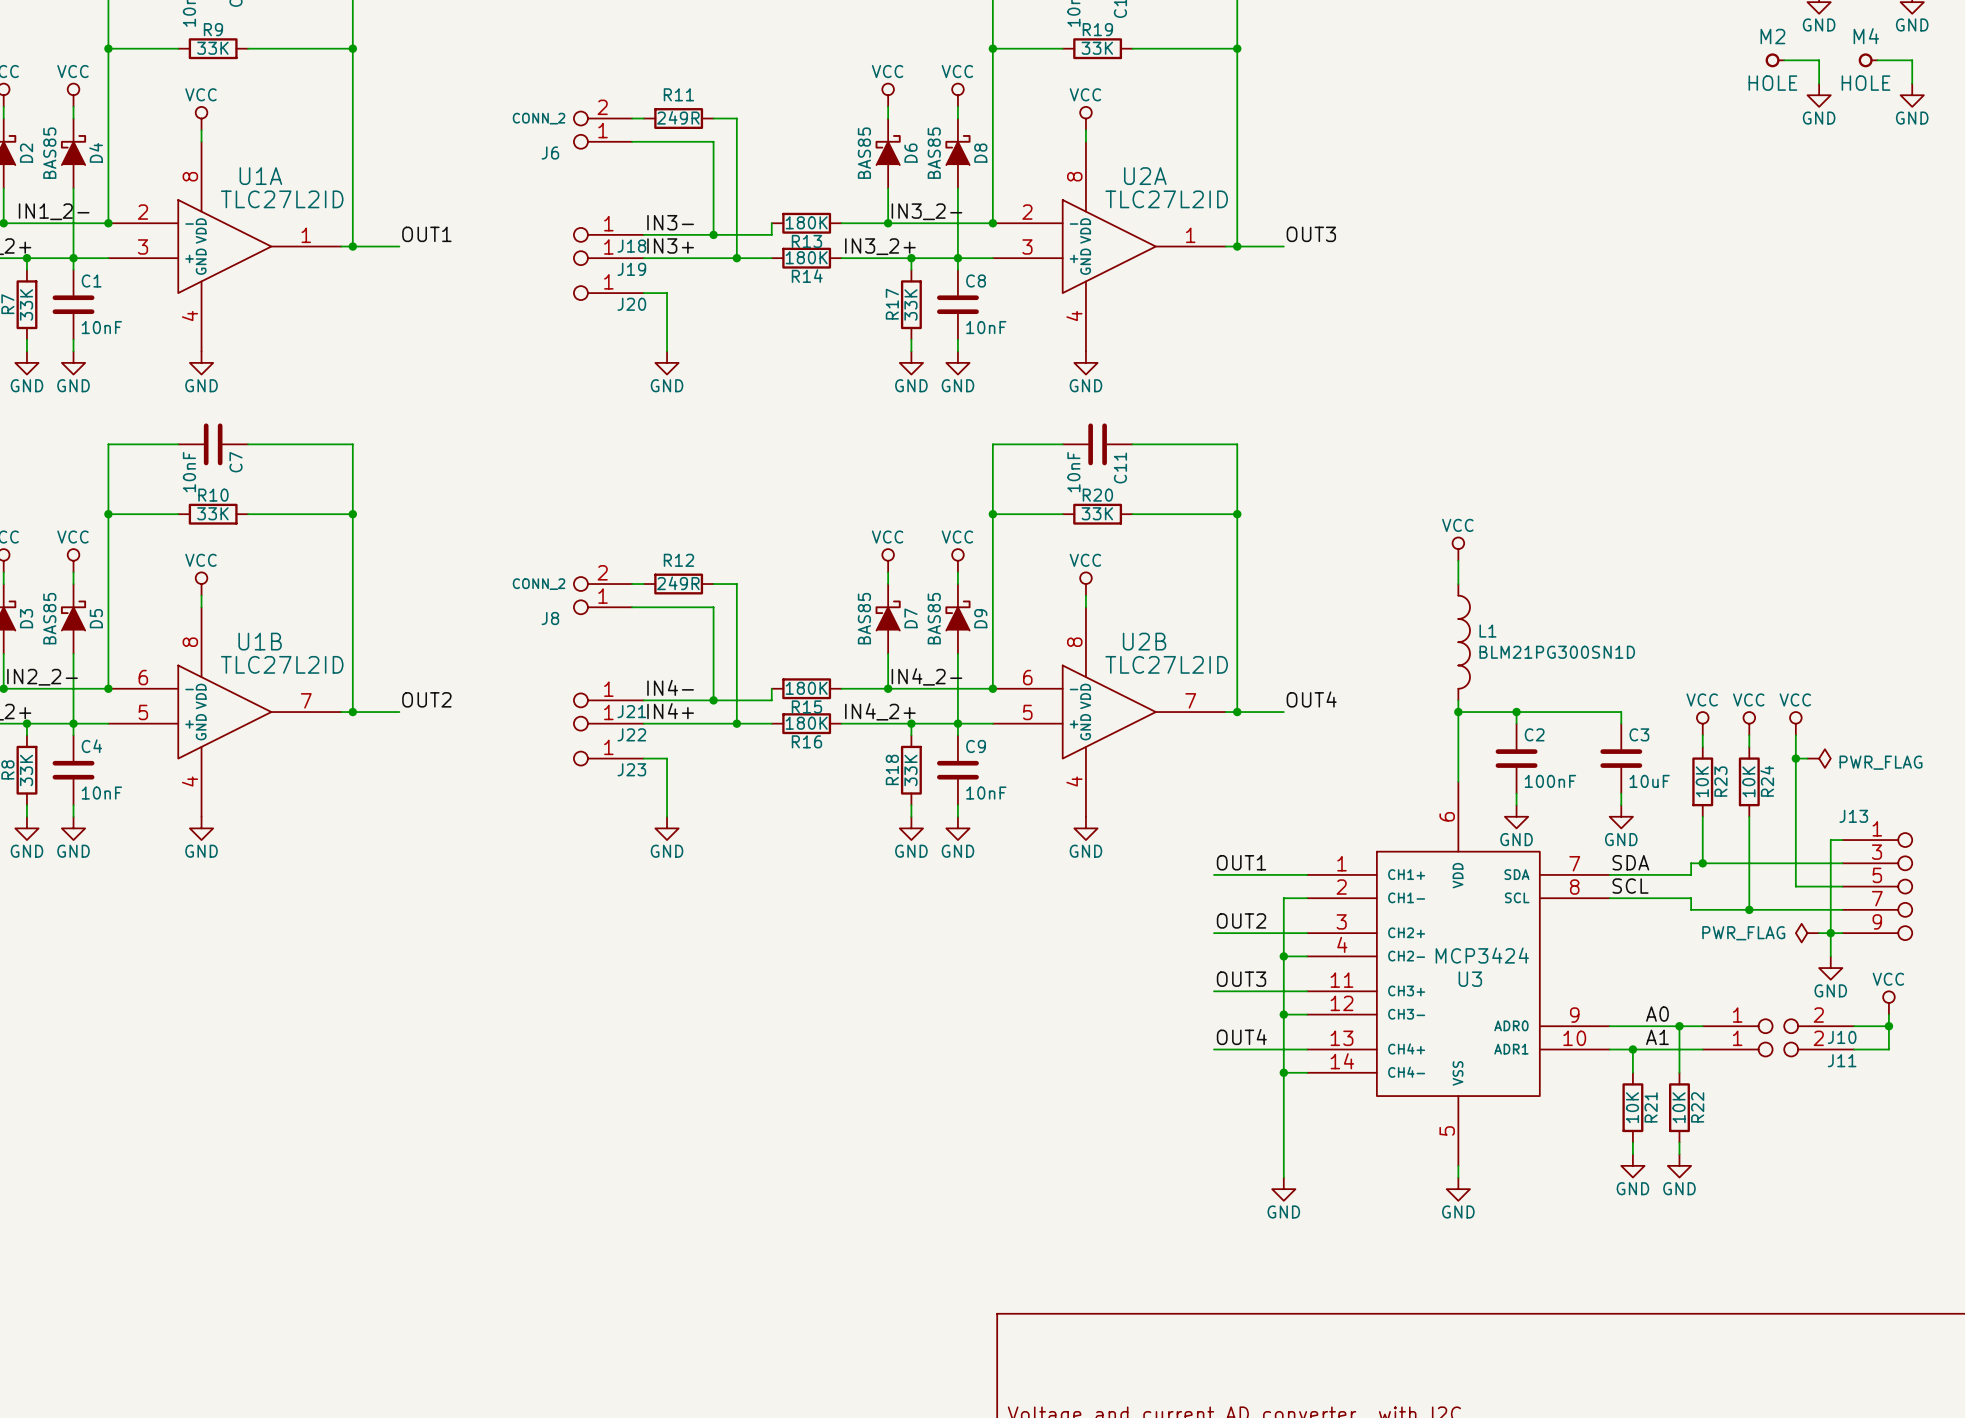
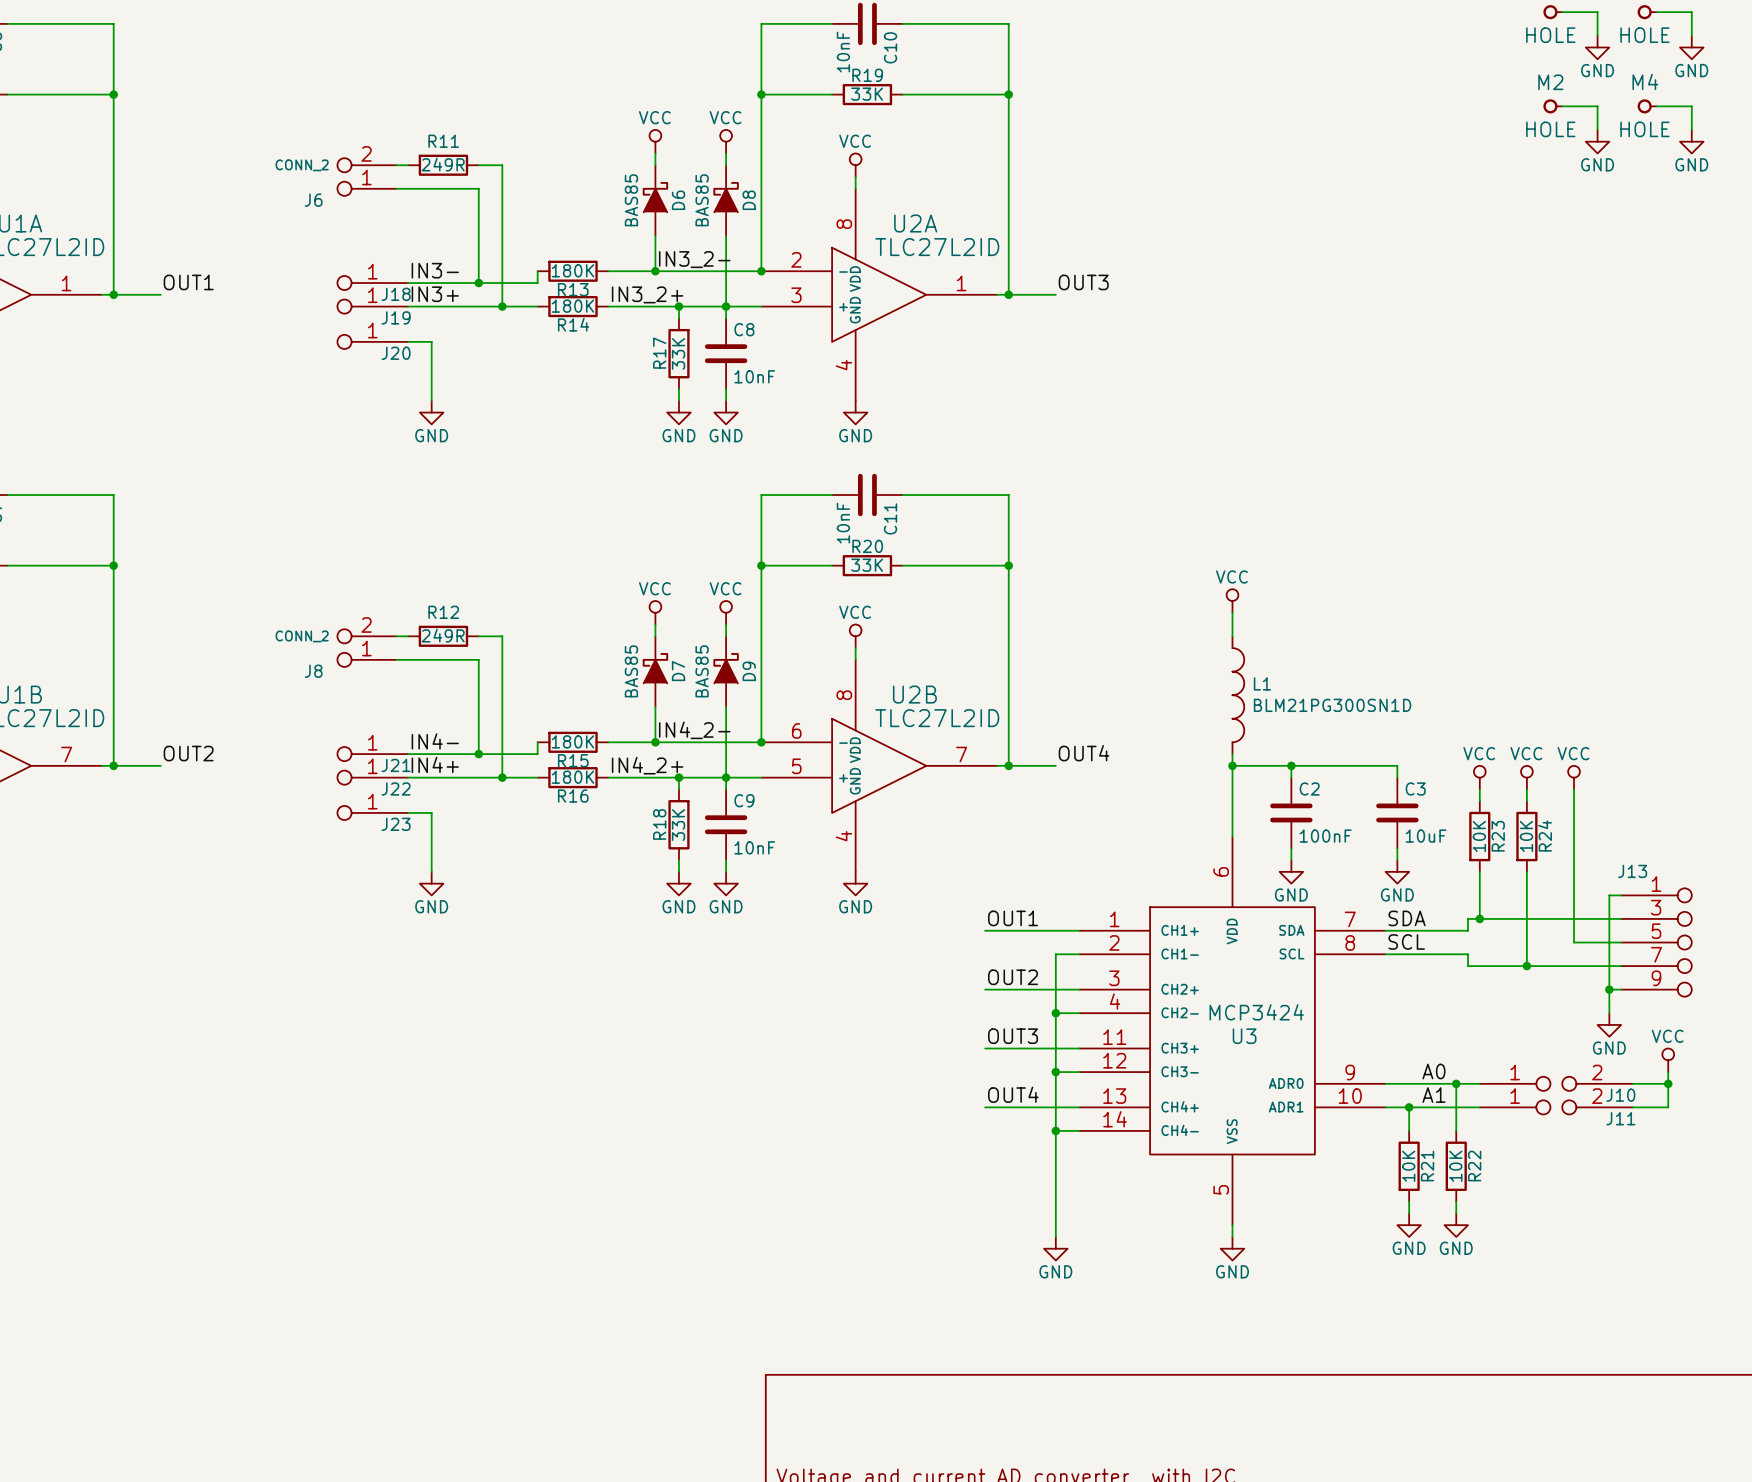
wire: (1795, 758) (1807, 758) -> none
junction: (1795, 758) -> none
power symbol: PWR_FLAG (1819, 758) -> none
power symbol: PWR_FLAG (1807, 933) -> none
wire: (1819, 933) (1830, 933) -> none

